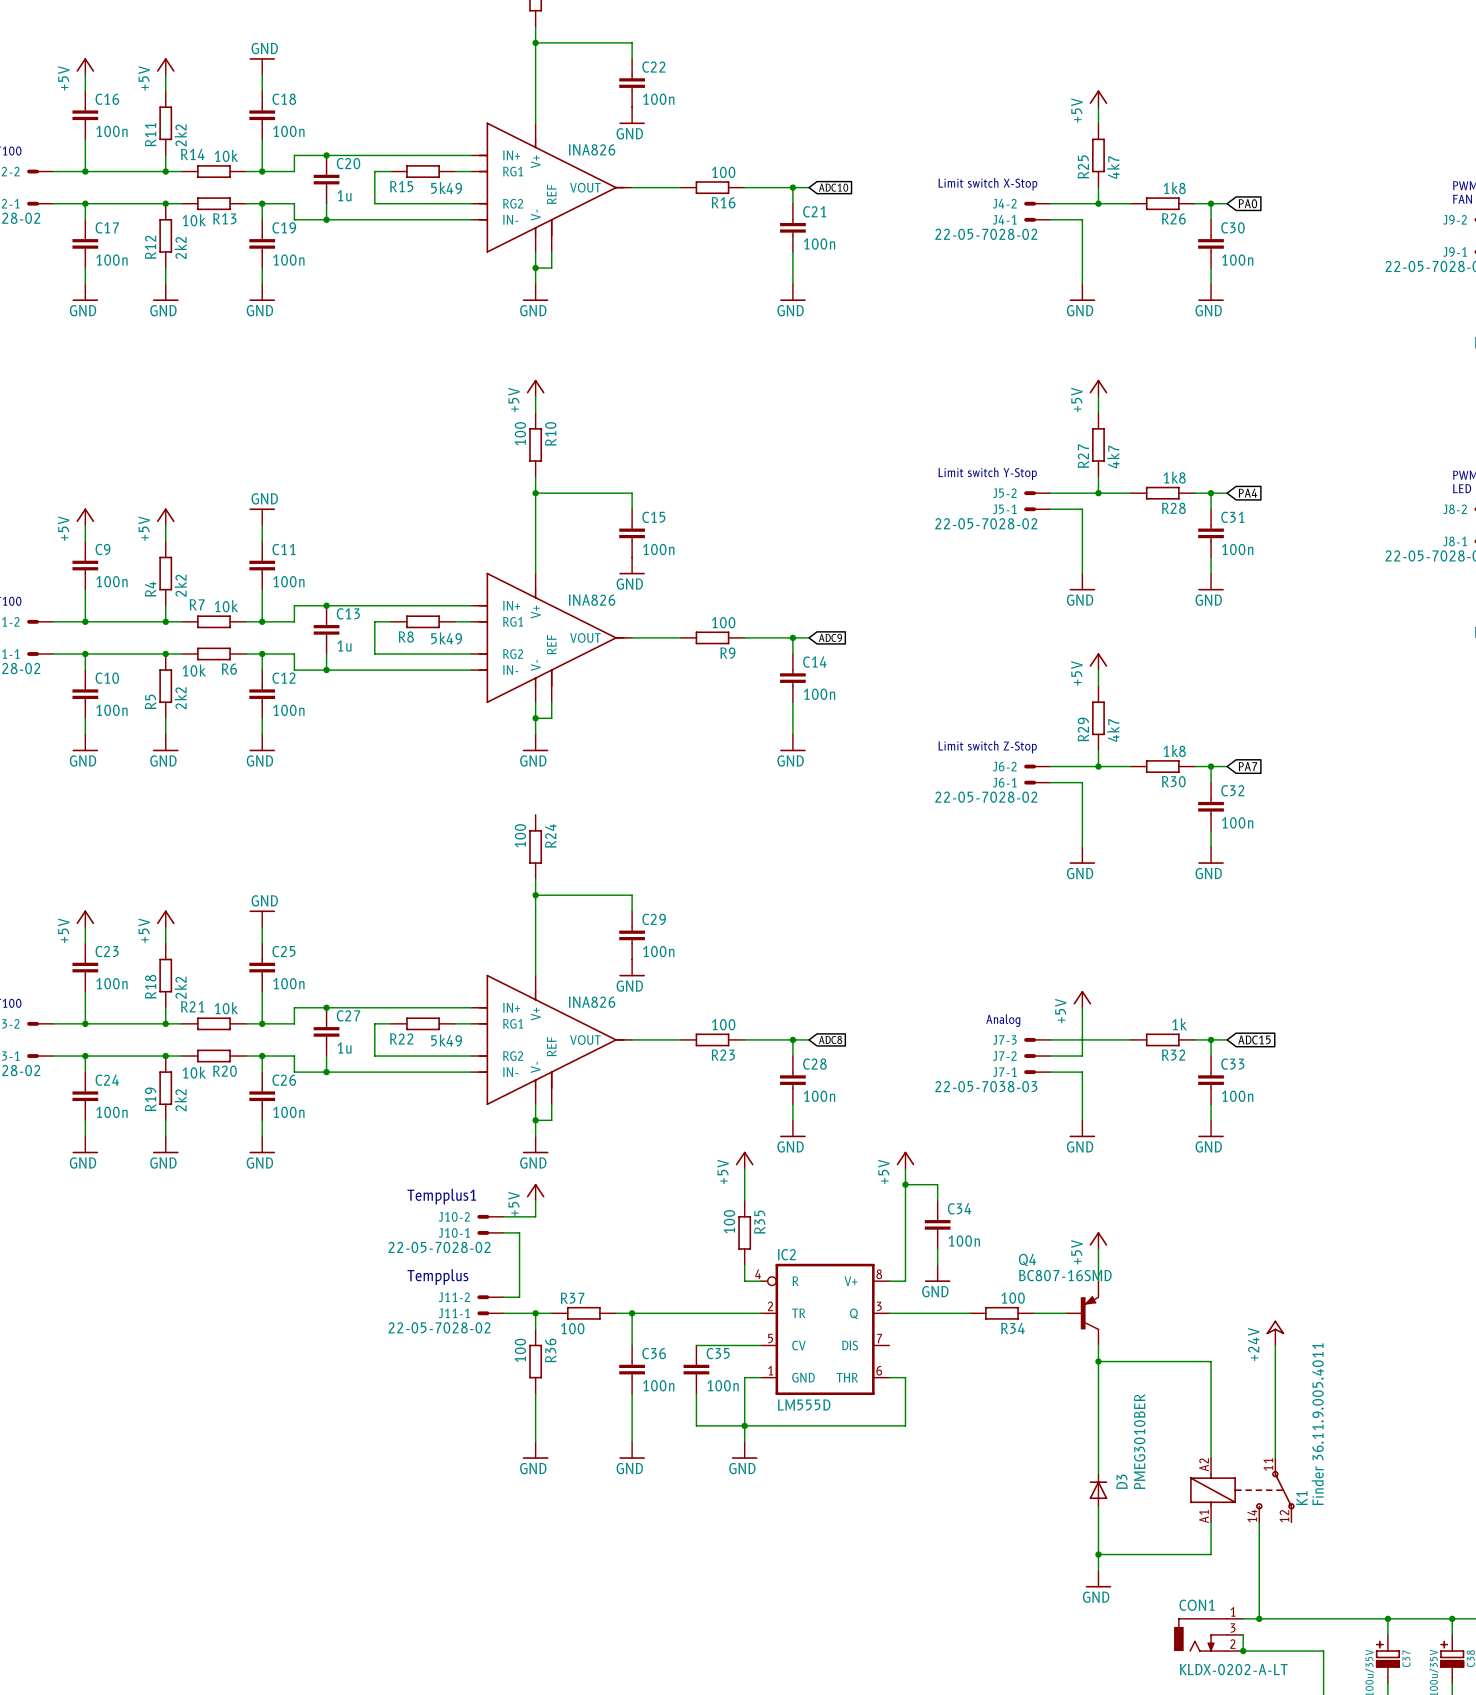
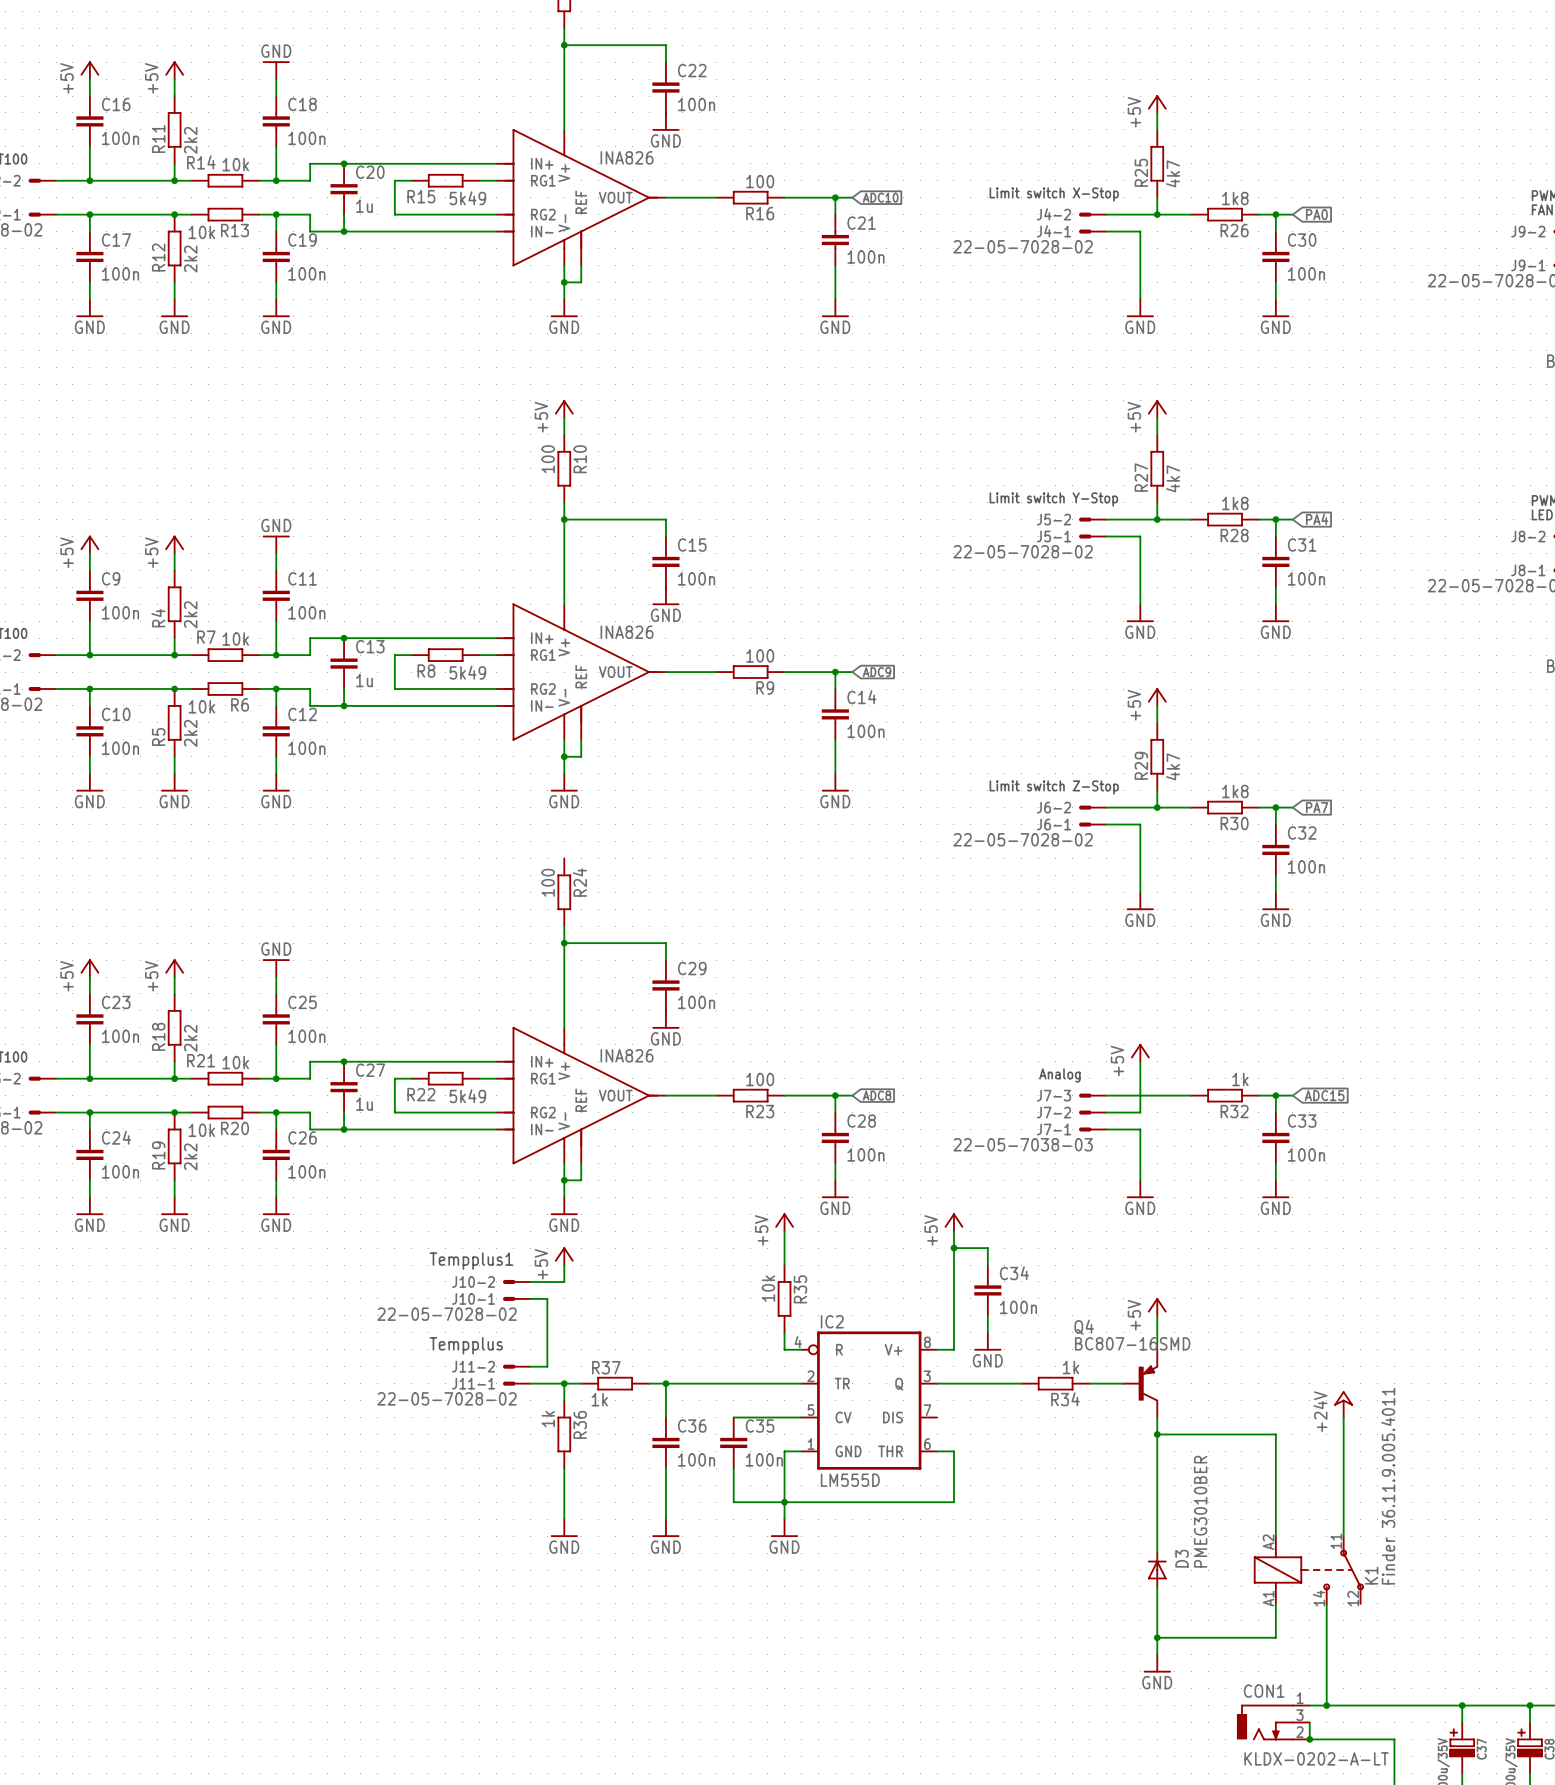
R35 value: 100 (729, 1221) -> 10k (768, 1288)
R34 value: 100 (1013, 1298) -> 1k (1071, 1367)
R37 value: 100 (572, 1328) -> 1k (599, 1399)
R36 value: 100 (520, 1350) -> 1k (548, 1419)

